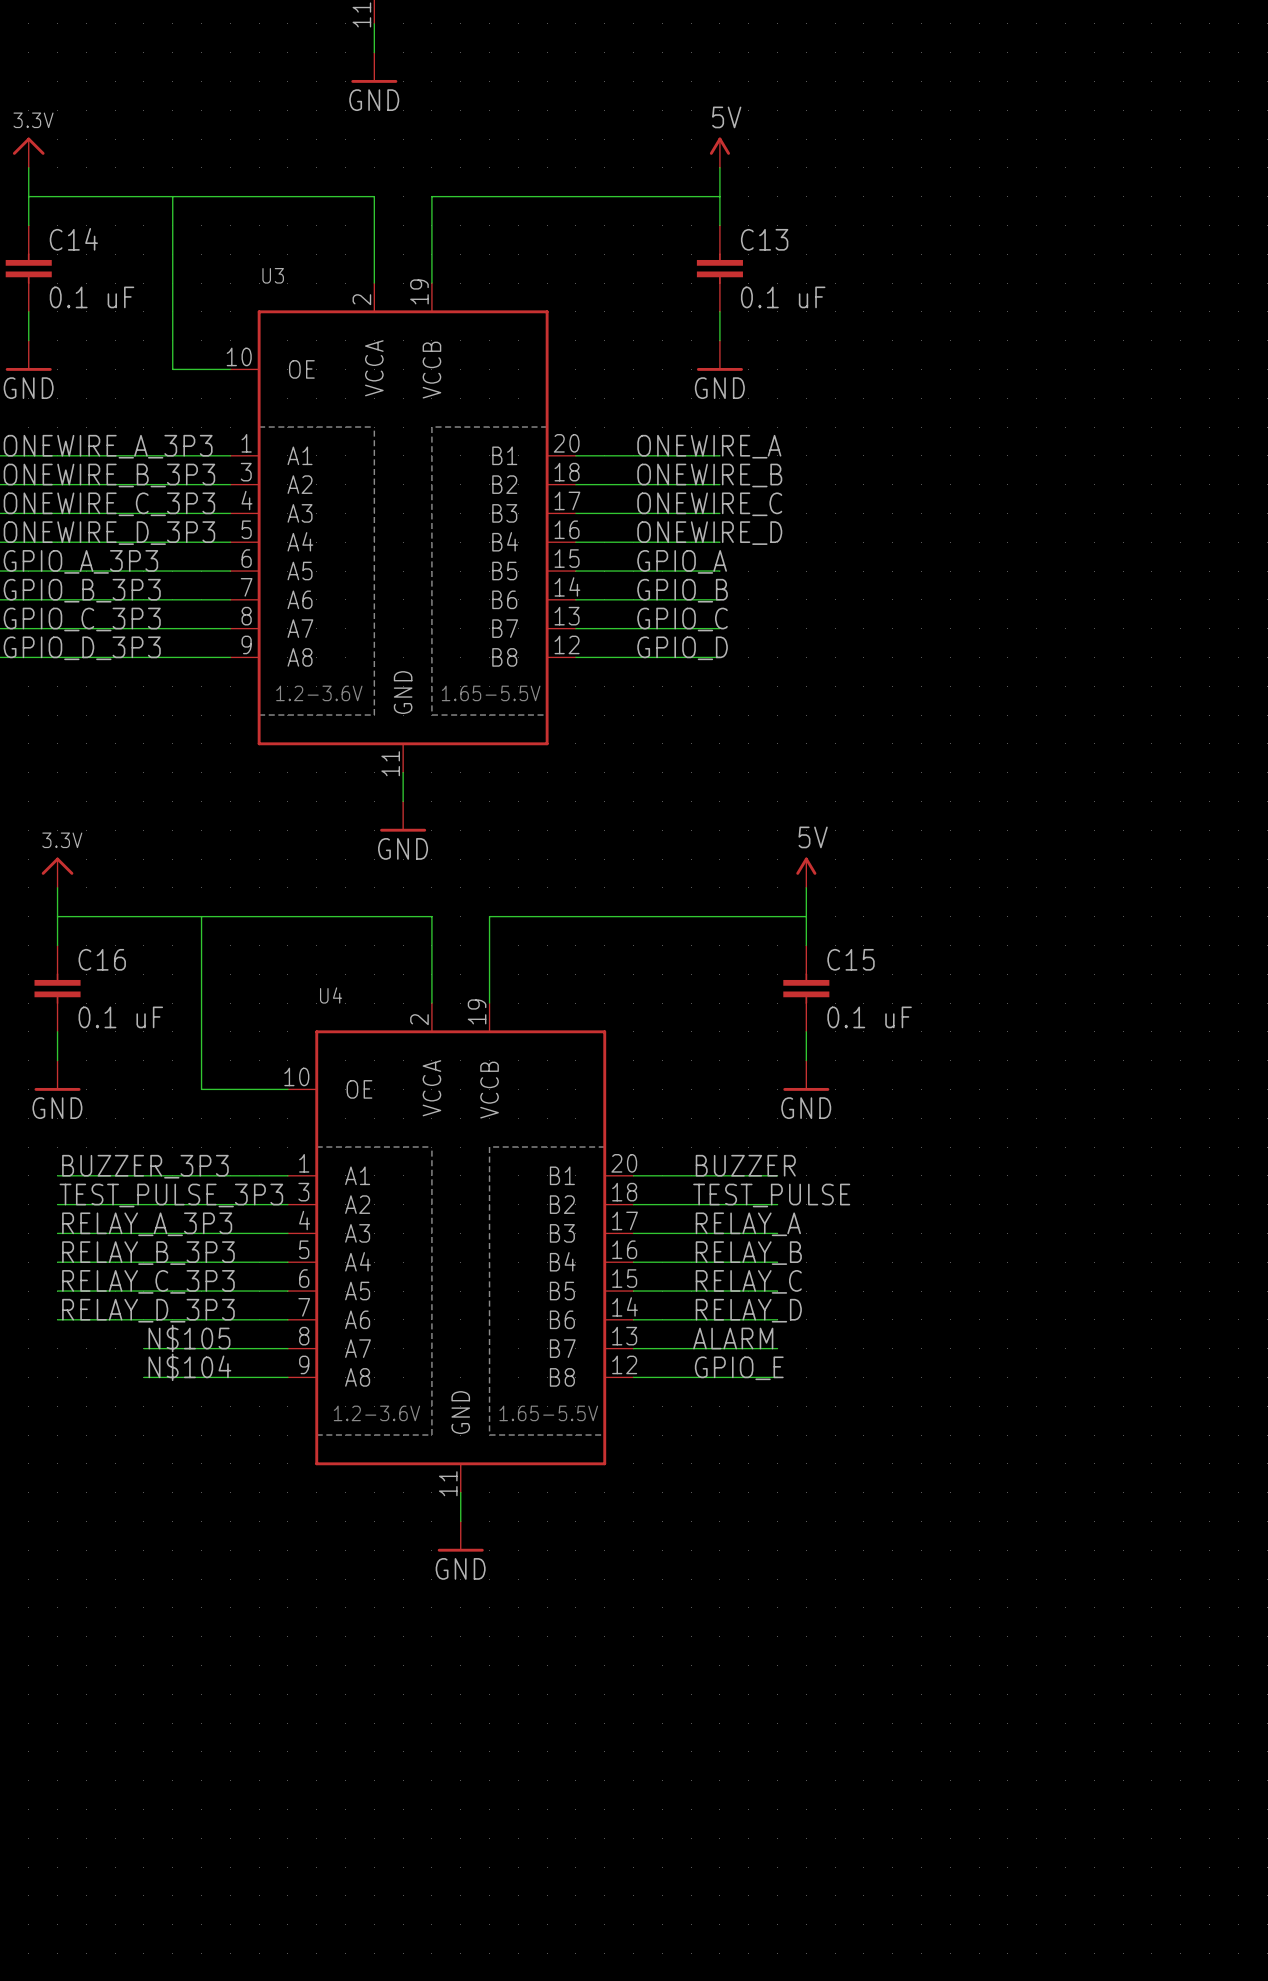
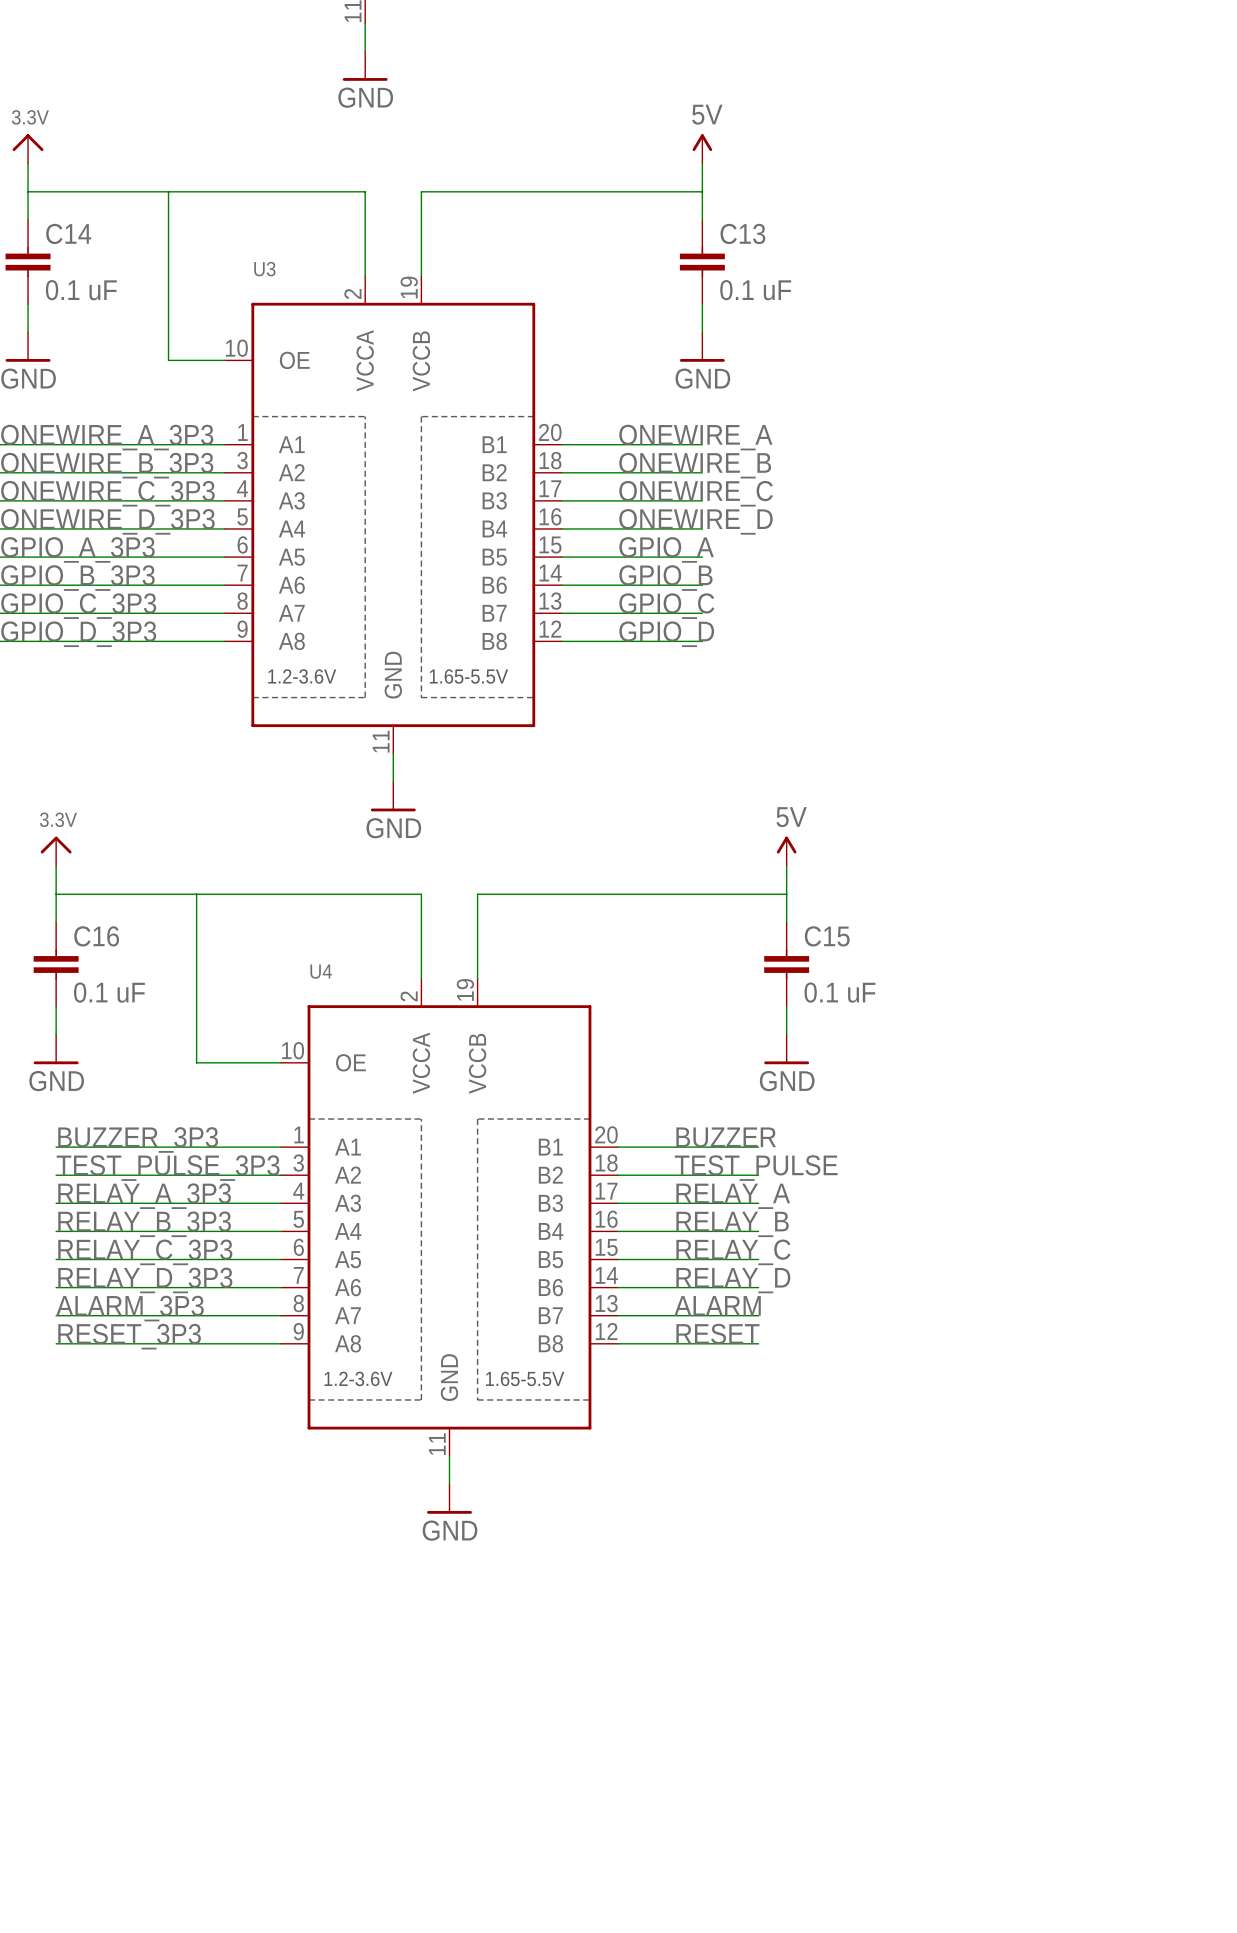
label: N$105 (189, 1338) -> none
label: none -> ALARM_3P3 (129, 1308)
wire: none -> (56, 1315) (140, 1315)
label: N$104 (189, 1367) -> none
label: none -> RESET_3P3 (129, 1336)
label: GPIO_E (739, 1368) -> RESET (717, 1333)
wire: none -> (56, 1343) (140, 1343)

